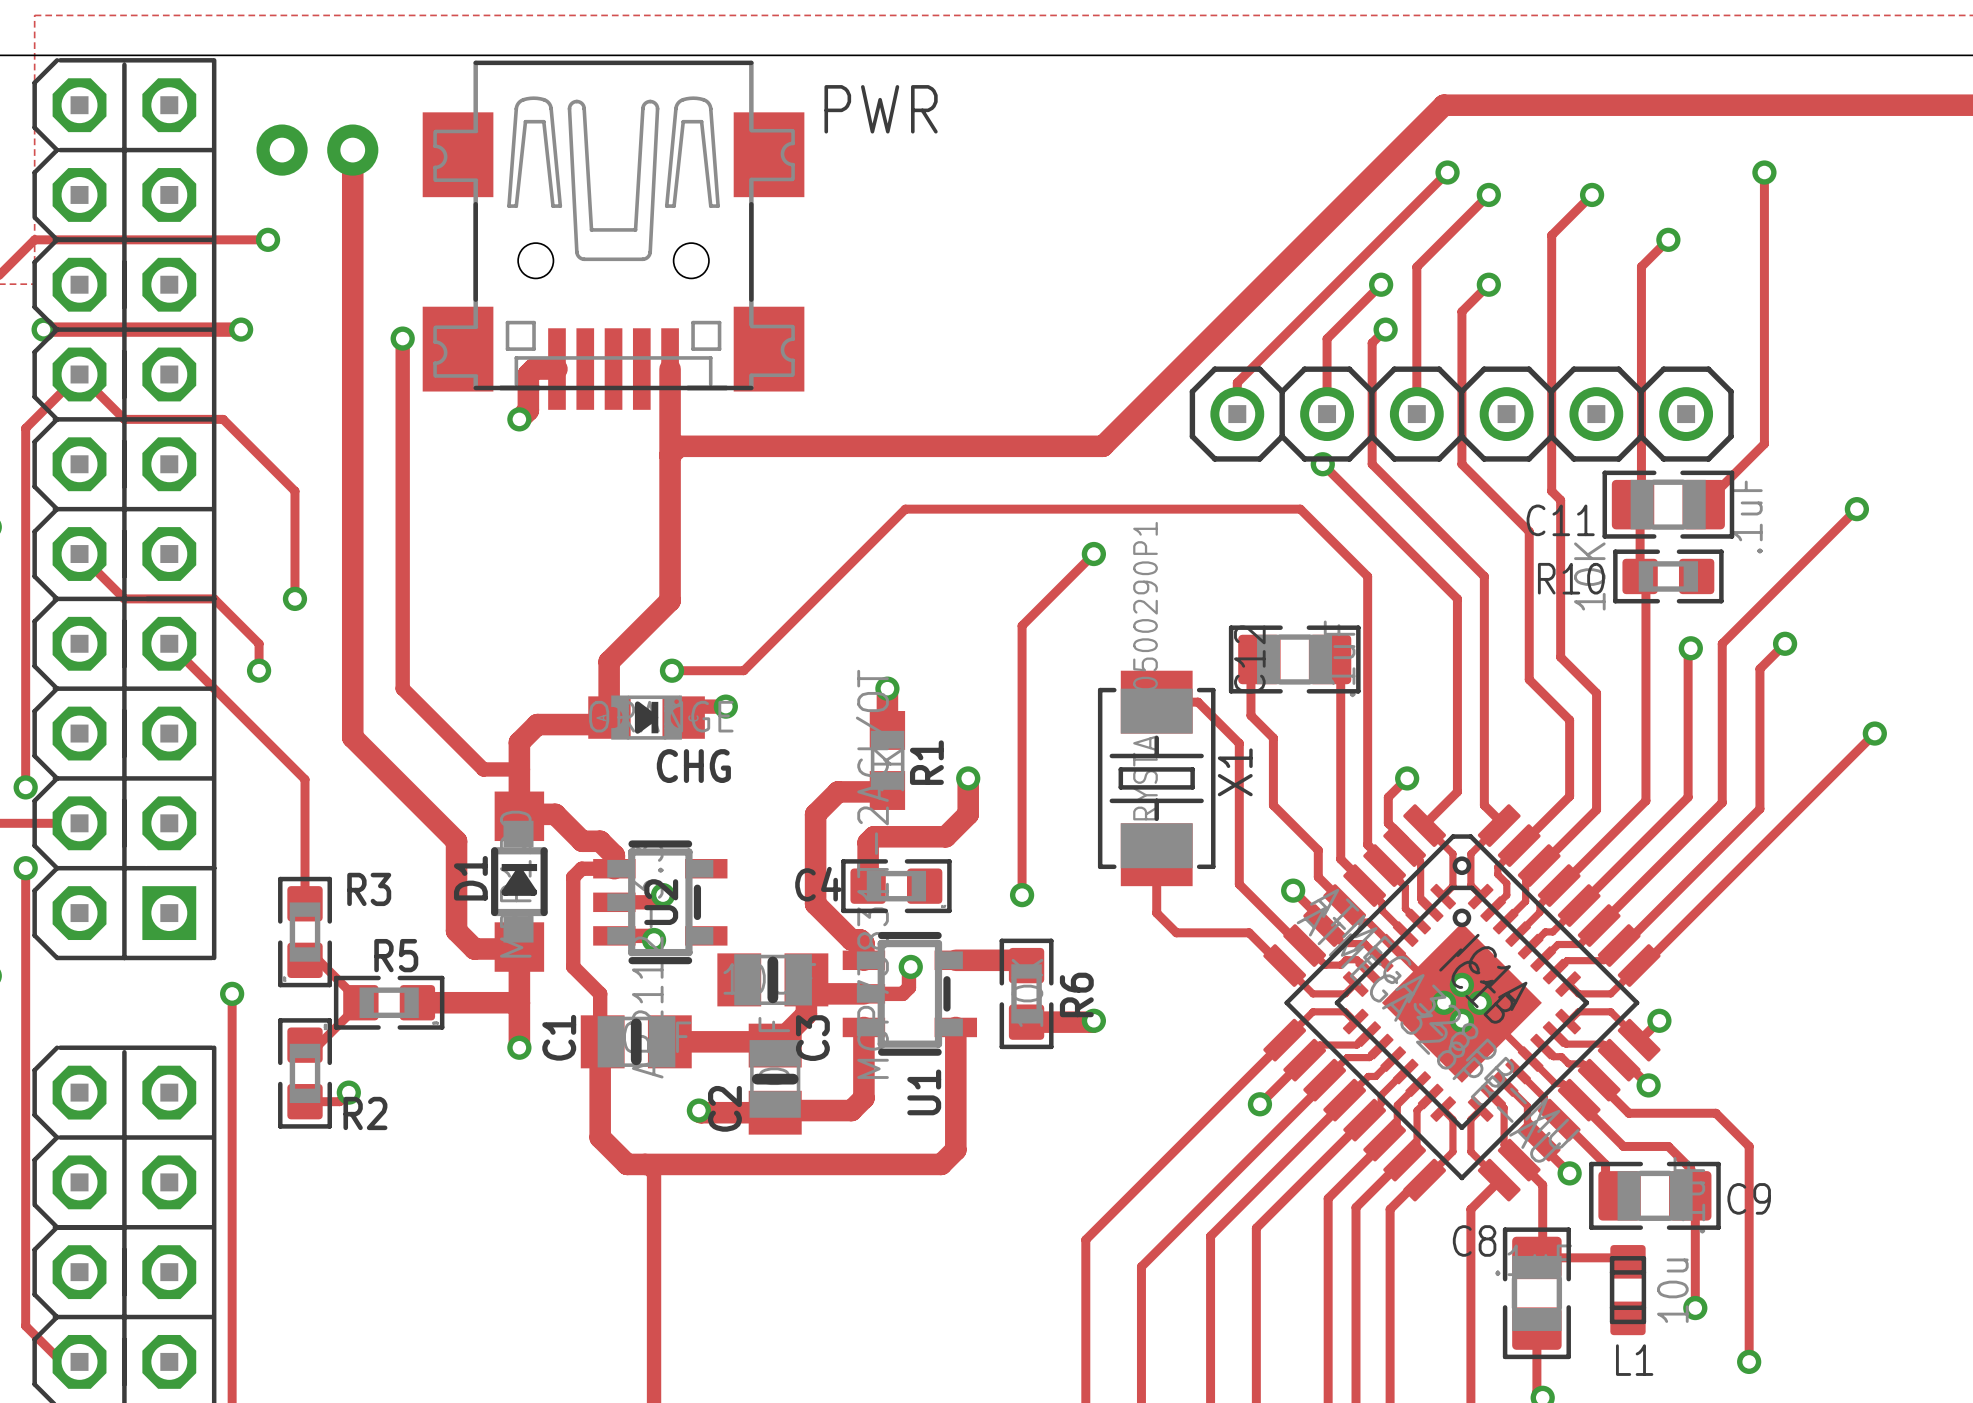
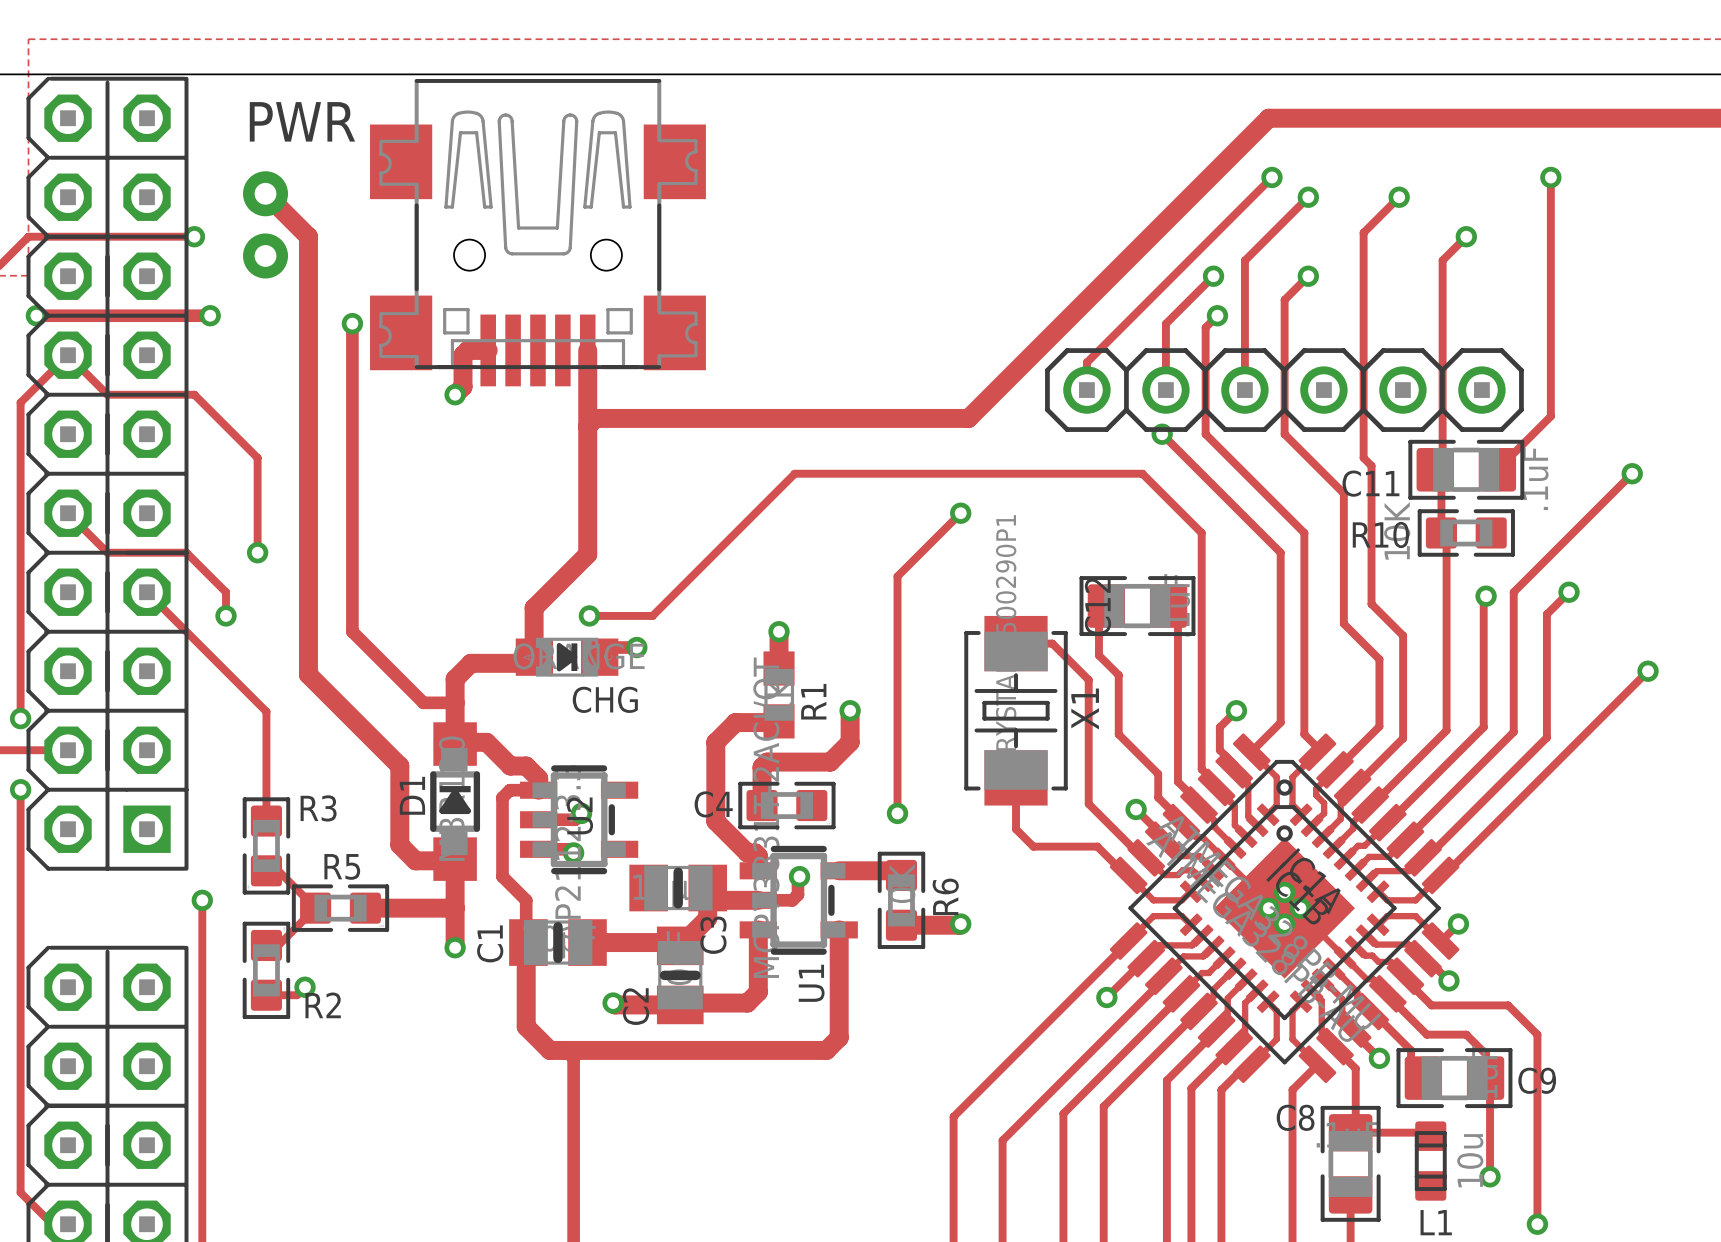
PWR name position: PWR (881, 109) -> PWR (302, 121)
part rotation: 0° (317, 150) -> 90° clockwise (265, 224)
part position: (317, 150) -> (265, 224)
track: (352, 150) (352, 239) -> (265, 193) (308, 236)
track: (223, 239) (268, 239) -> none
via position: (268, 239) -> (194, 236)

